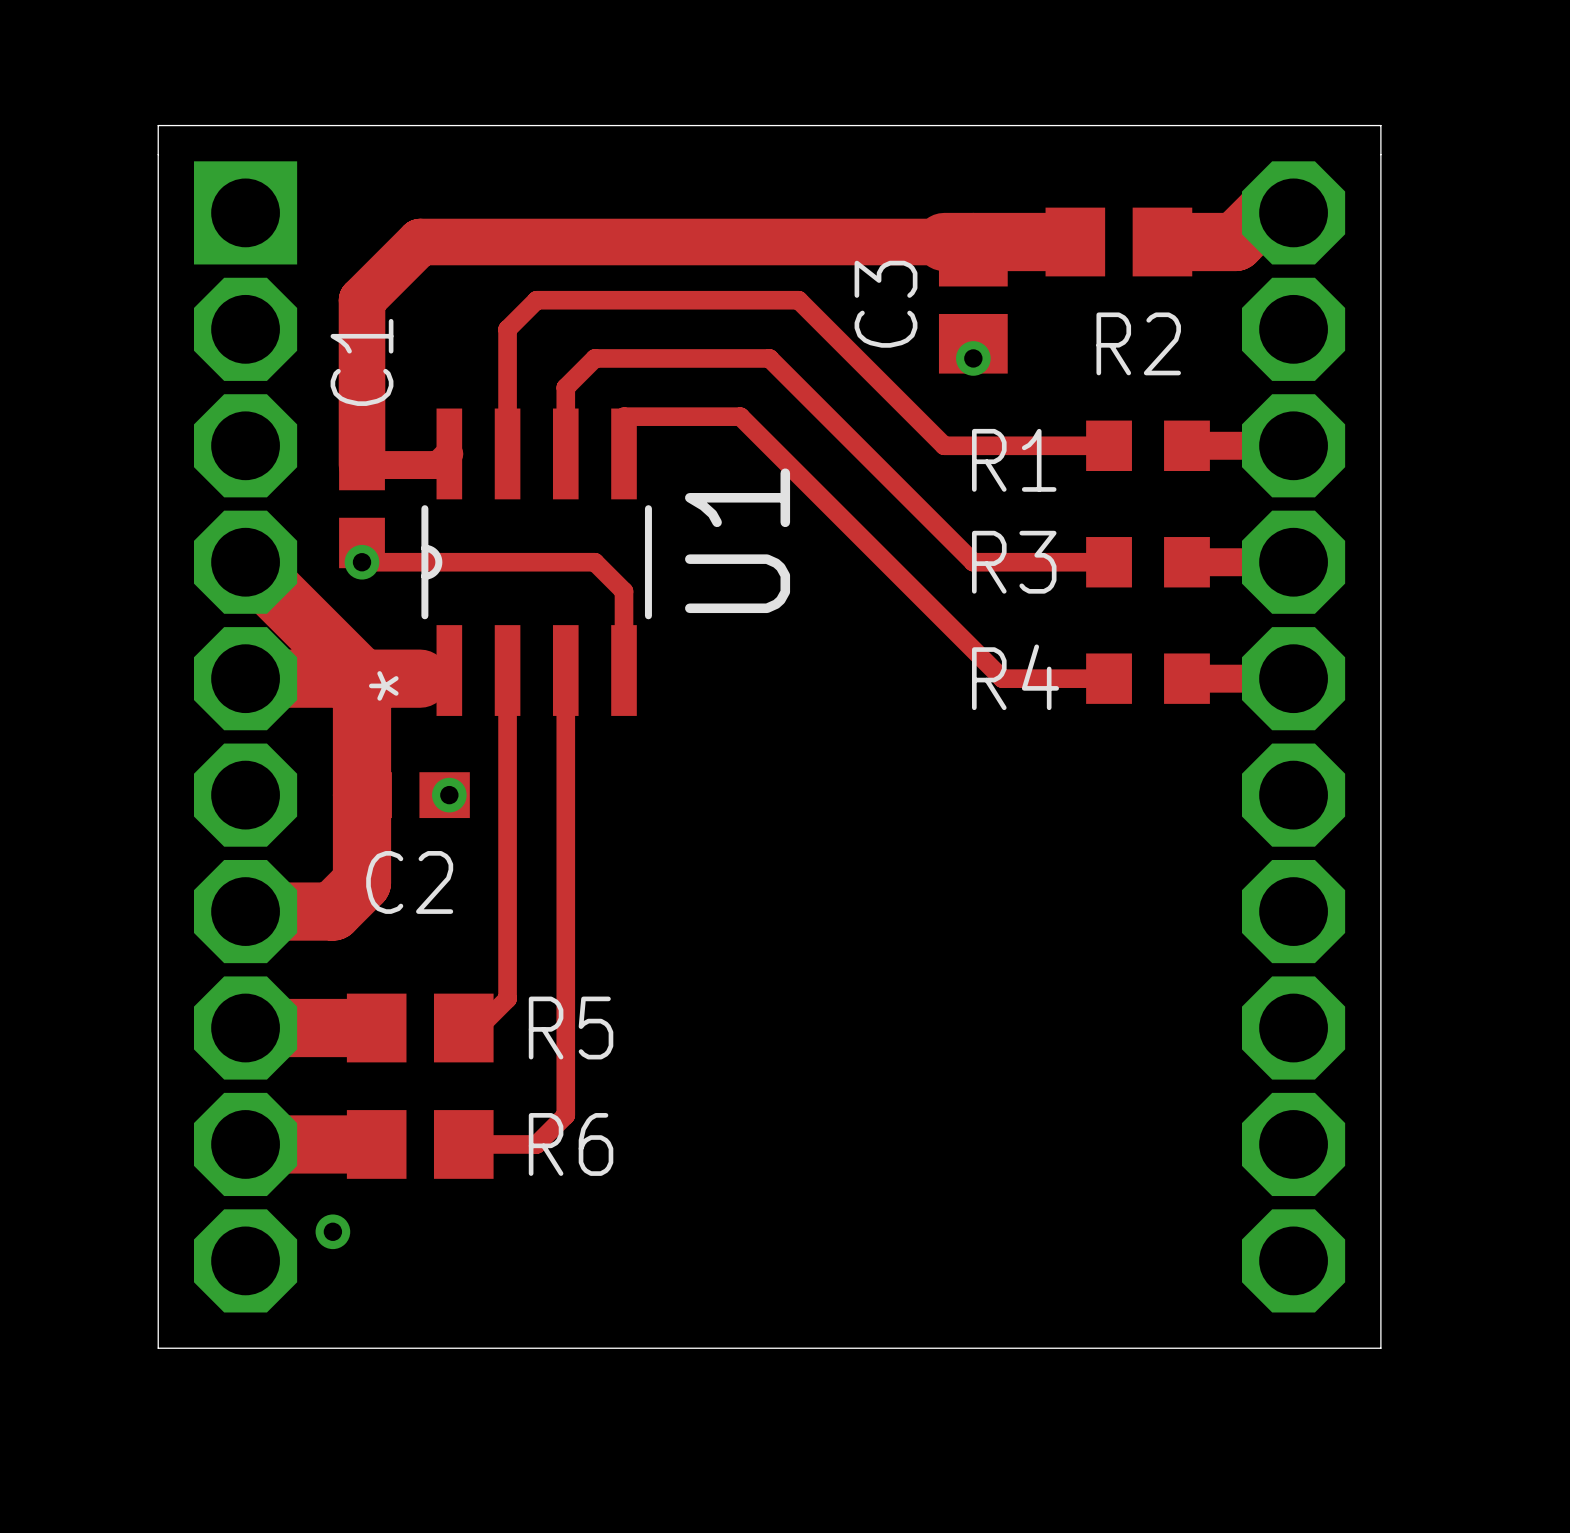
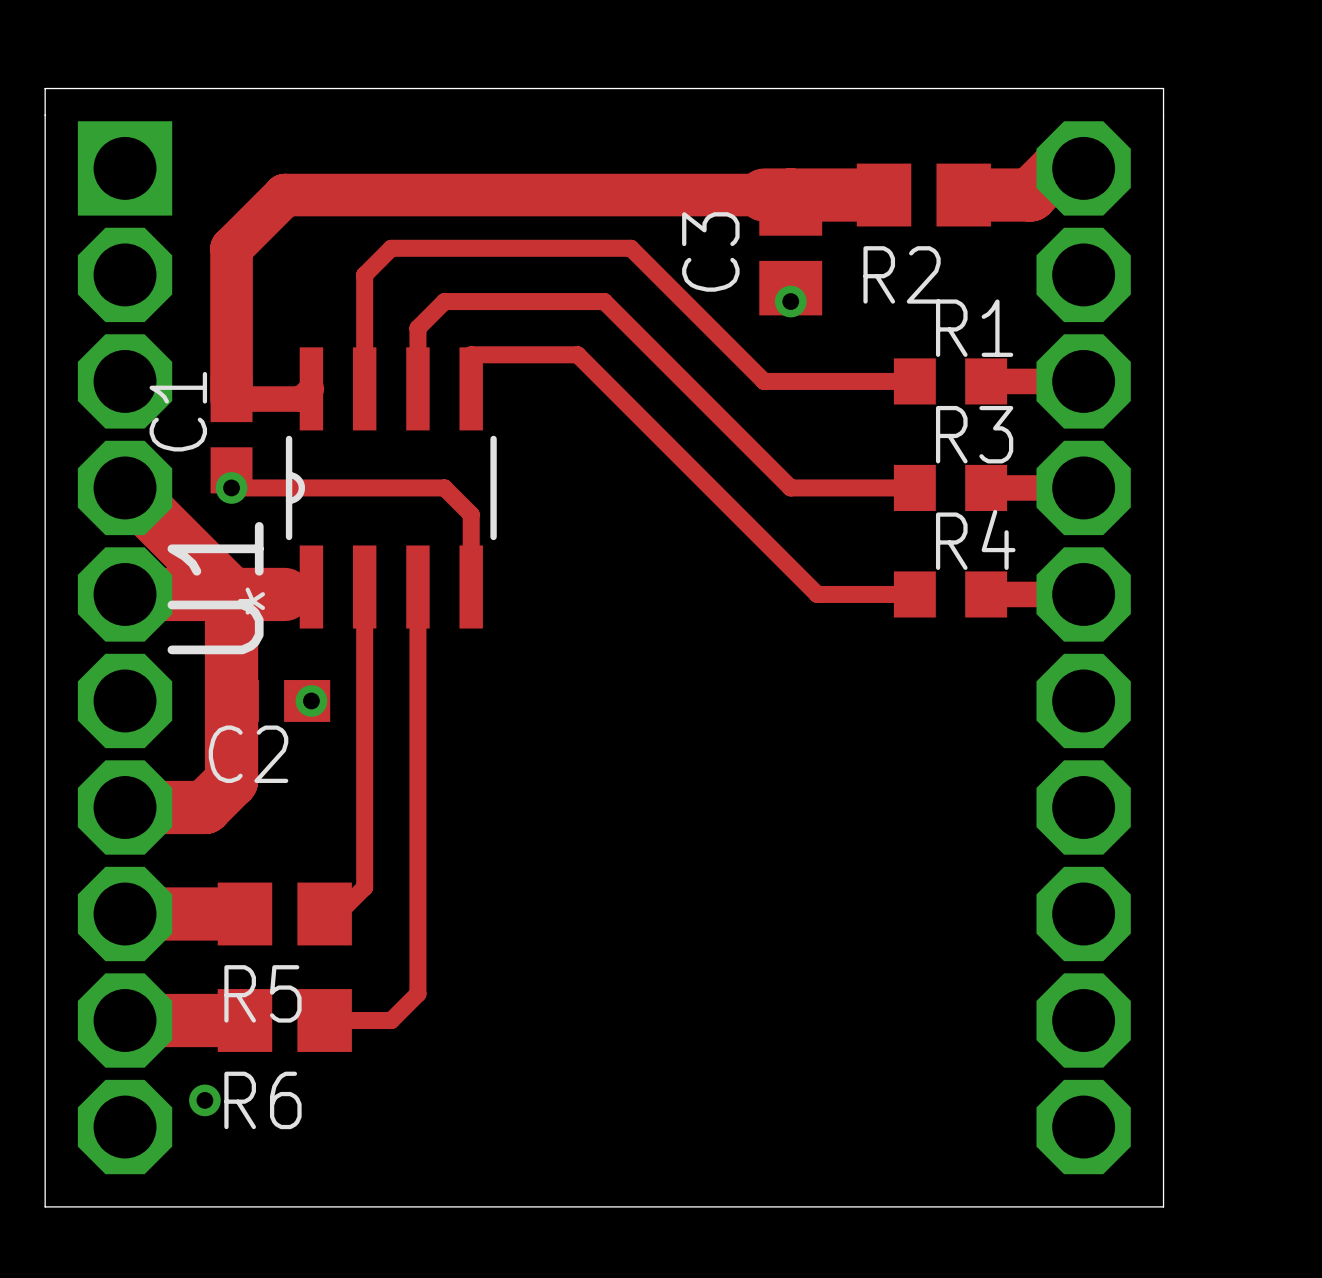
R2 name position: R2 (1138, 343) -> R2 (902, 274)
C1 name position: C1 (362, 362) -> C1 (178, 411)
R1 name position: R1 (1014, 460) -> R1 (974, 328)
U1 name position: U1 (737, 540) -> U1 (215, 588)
R3 name position: R3 (1014, 562) -> R3 (974, 434)
R4 name position: R4 (1015, 677) -> R4 (975, 539)
C2 name position: C2 (409, 882) -> C2 (248, 754)
R5 name position: R5 (571, 1028) -> R5 (262, 993)
R6 name position: R6 (571, 1144) -> R6 (262, 1100)

